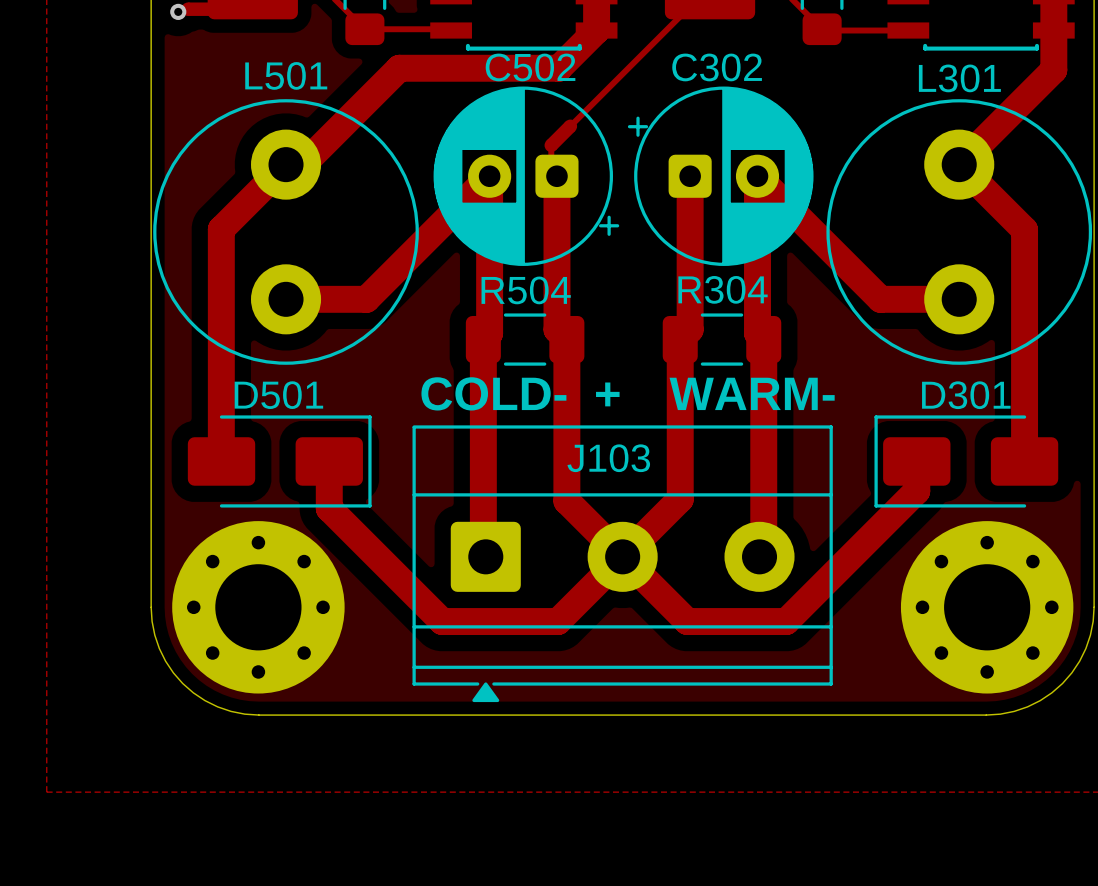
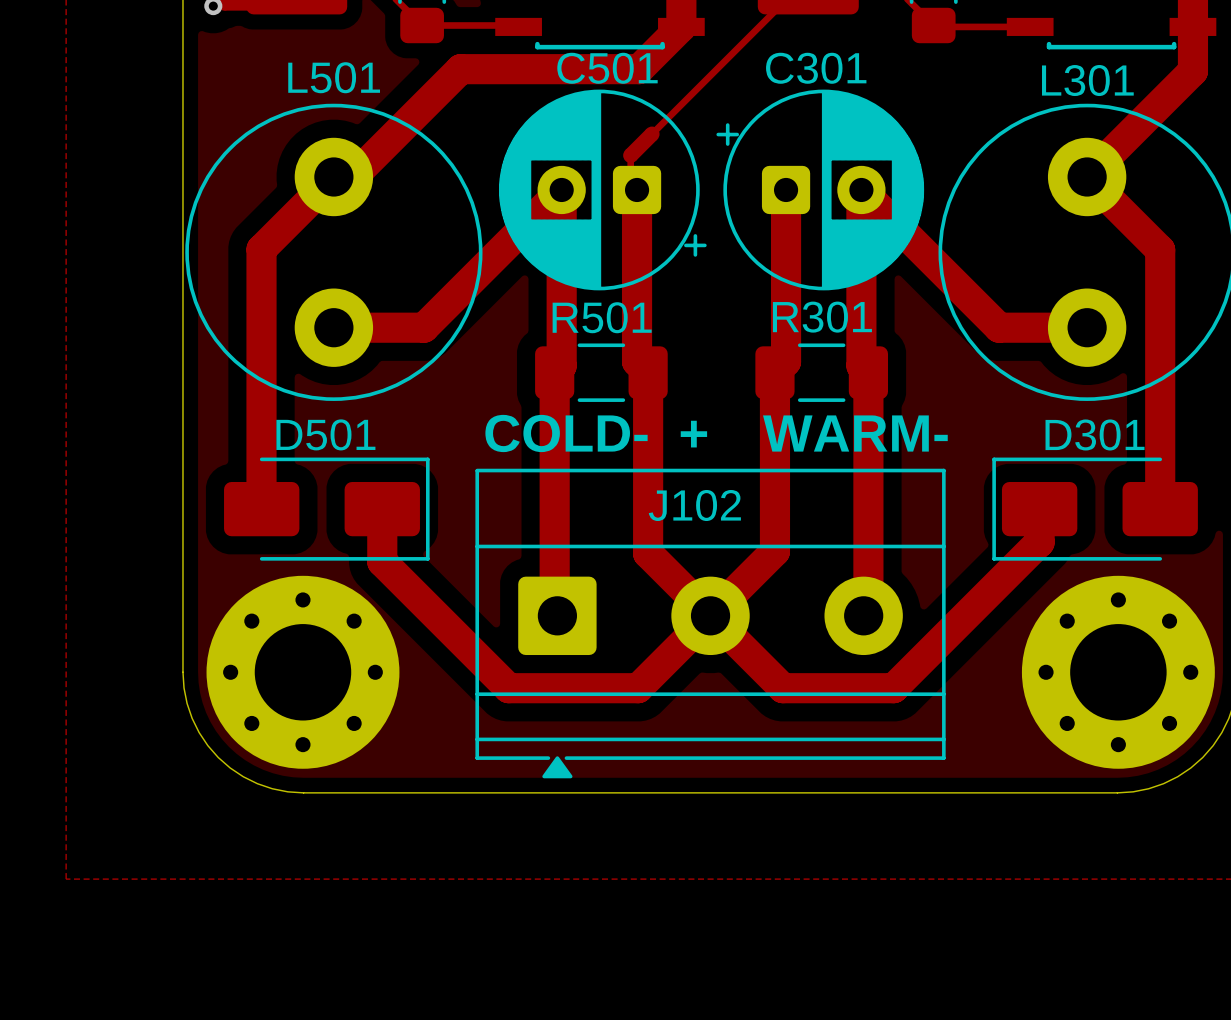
C502 name: C502 (530, 67) -> C501 (607, 68)
C302 name: C302 (717, 67) -> C301 (816, 68)
R304 name: R304 (723, 289) -> R301 (822, 317)
R504 name: R504 (526, 290) -> R501 (602, 317)
J103 name: J103 (608, 458) -> J102 (694, 505)

